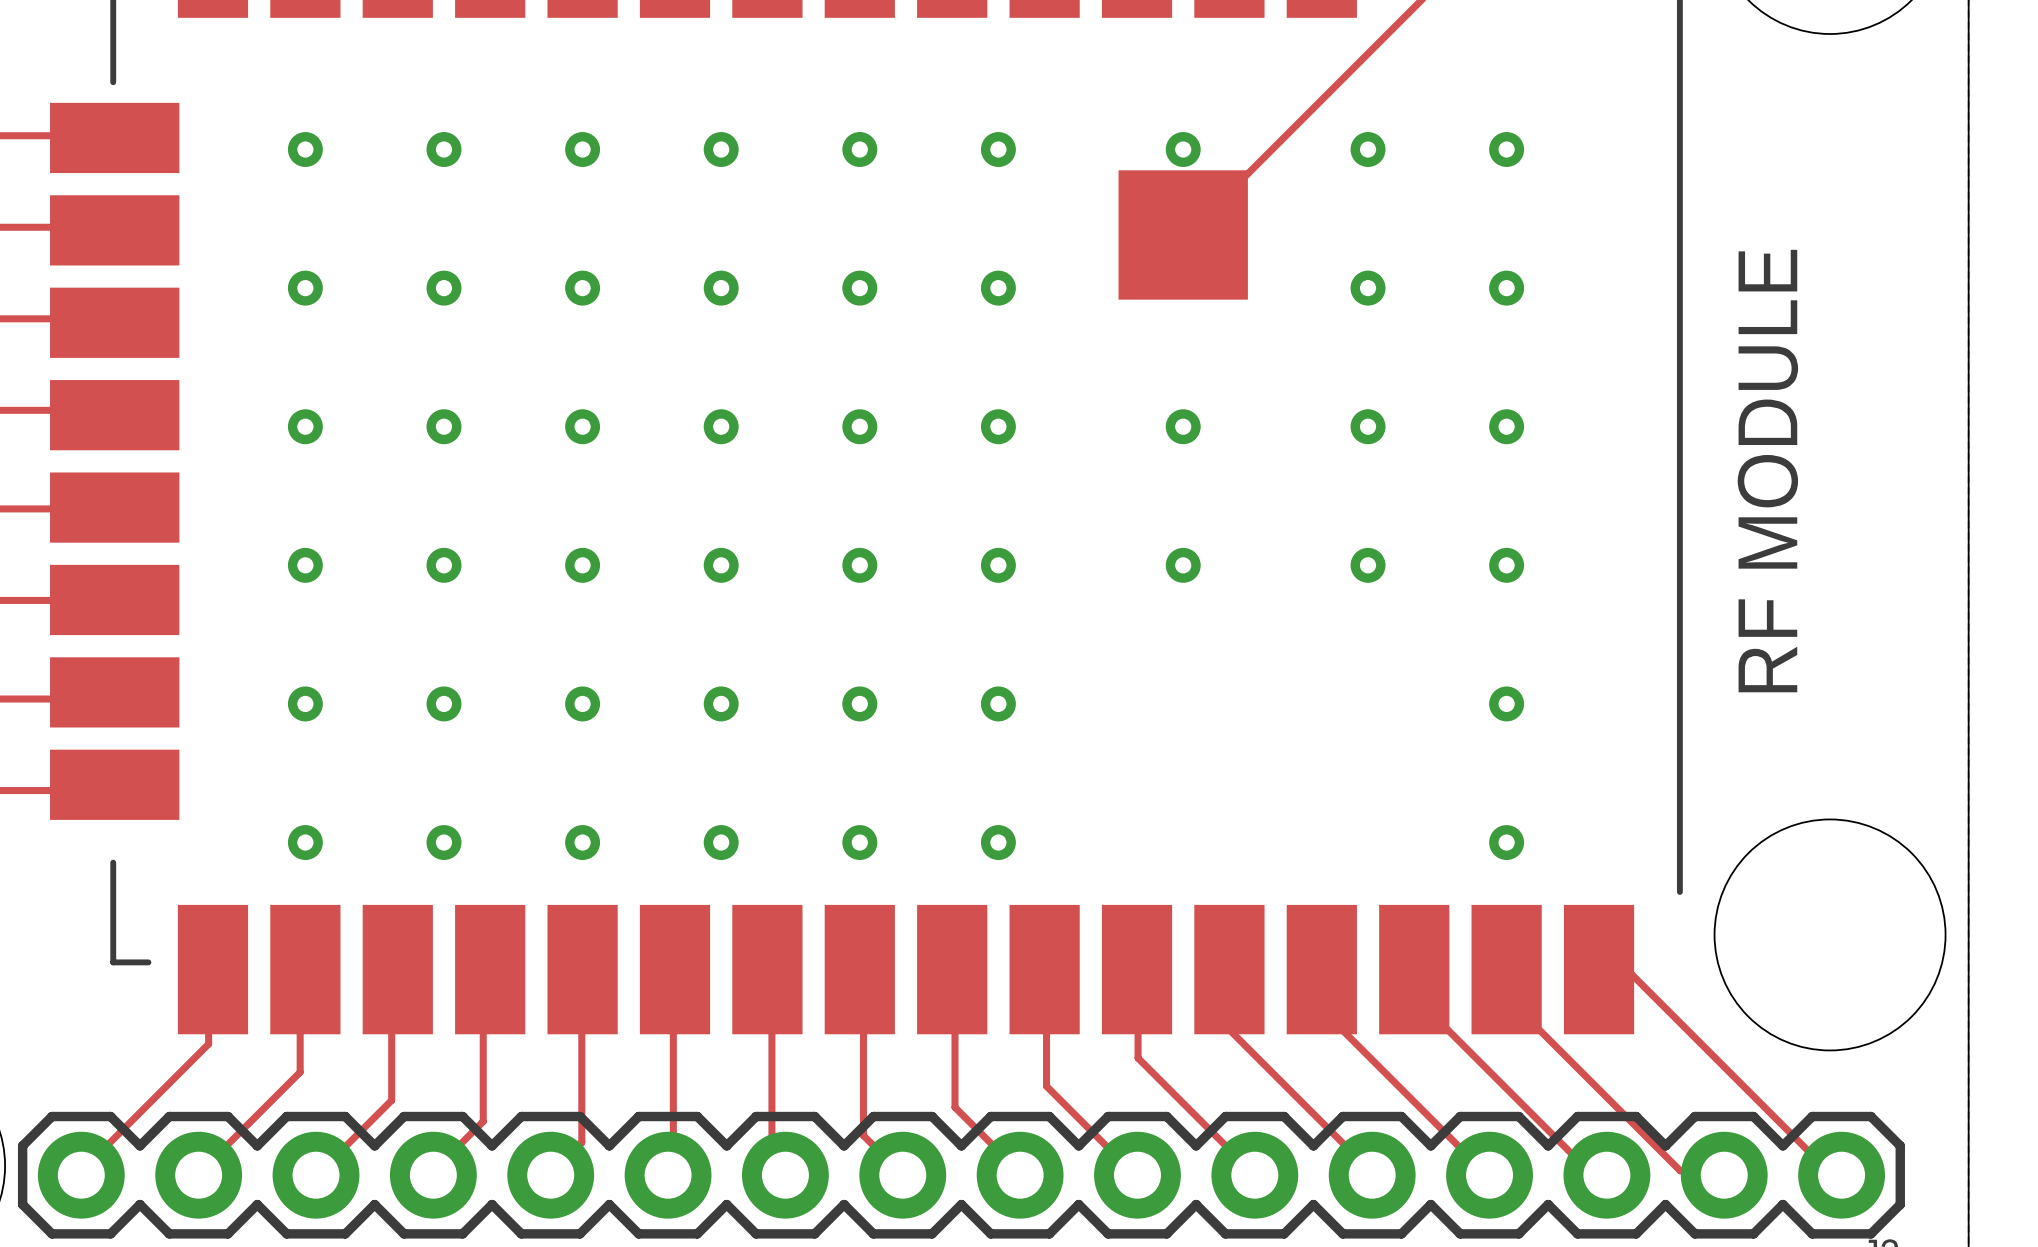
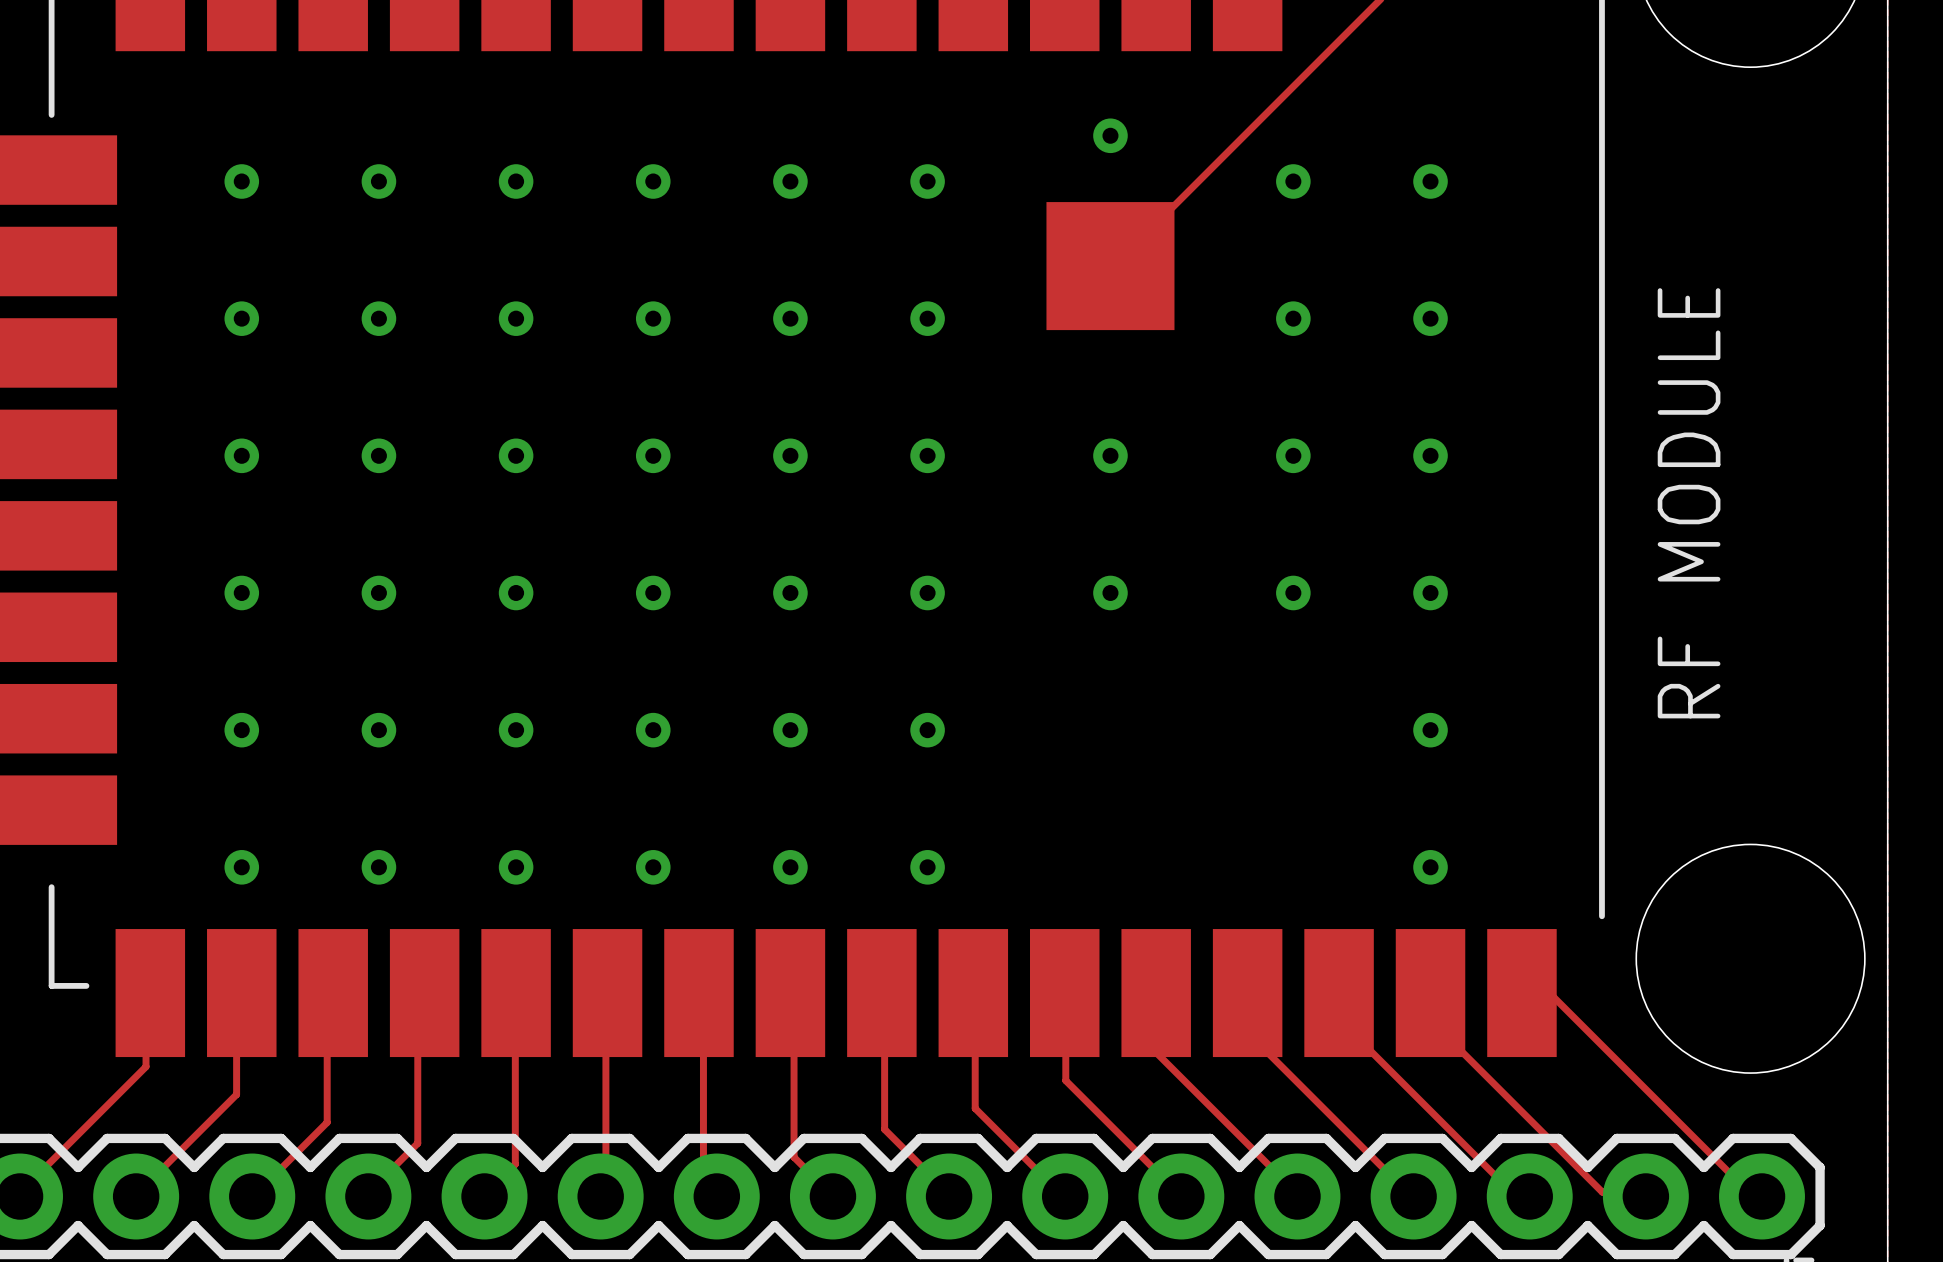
via position: (1183, 149) -> (1110, 135)

